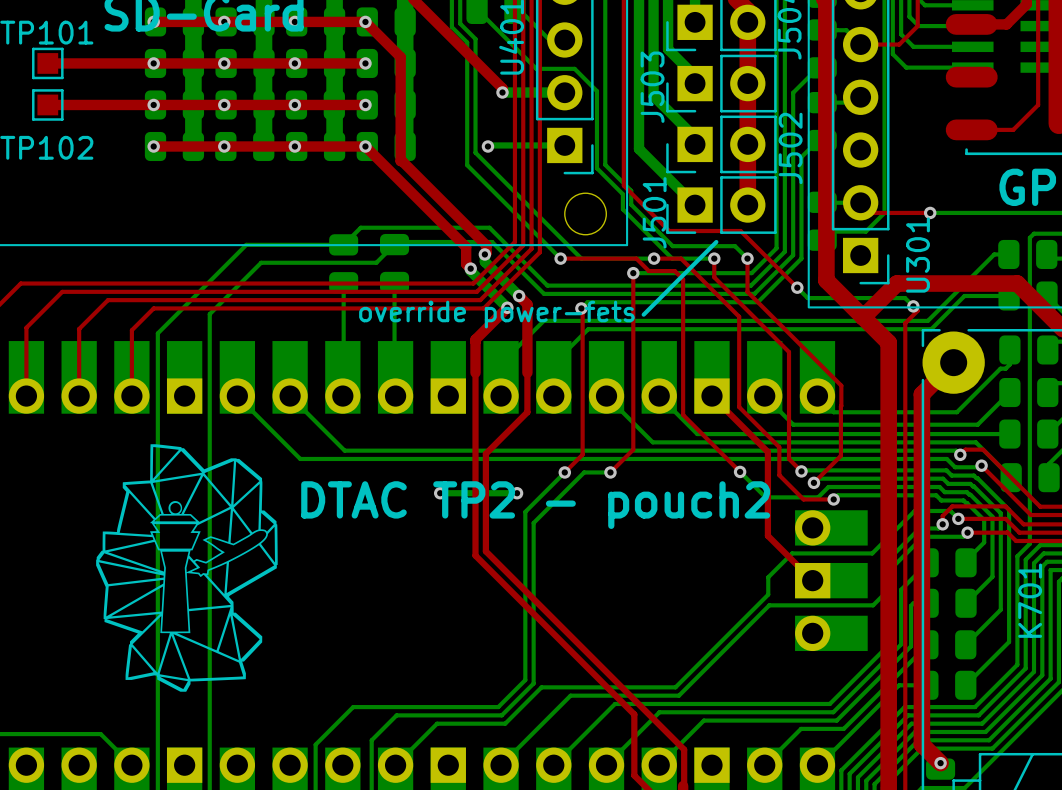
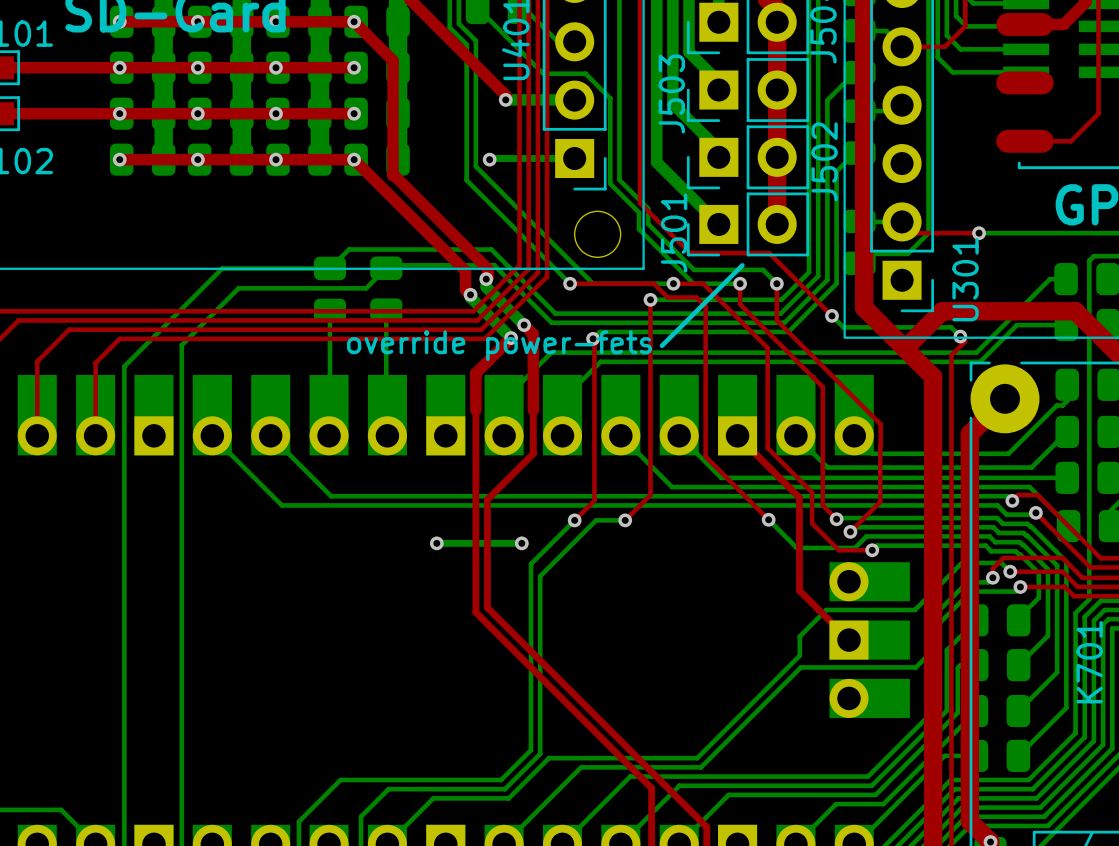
drawing: [96, 444, 278, 692] -> none
text: DTAC TP2 - pouch2 (535, 505) -> none

